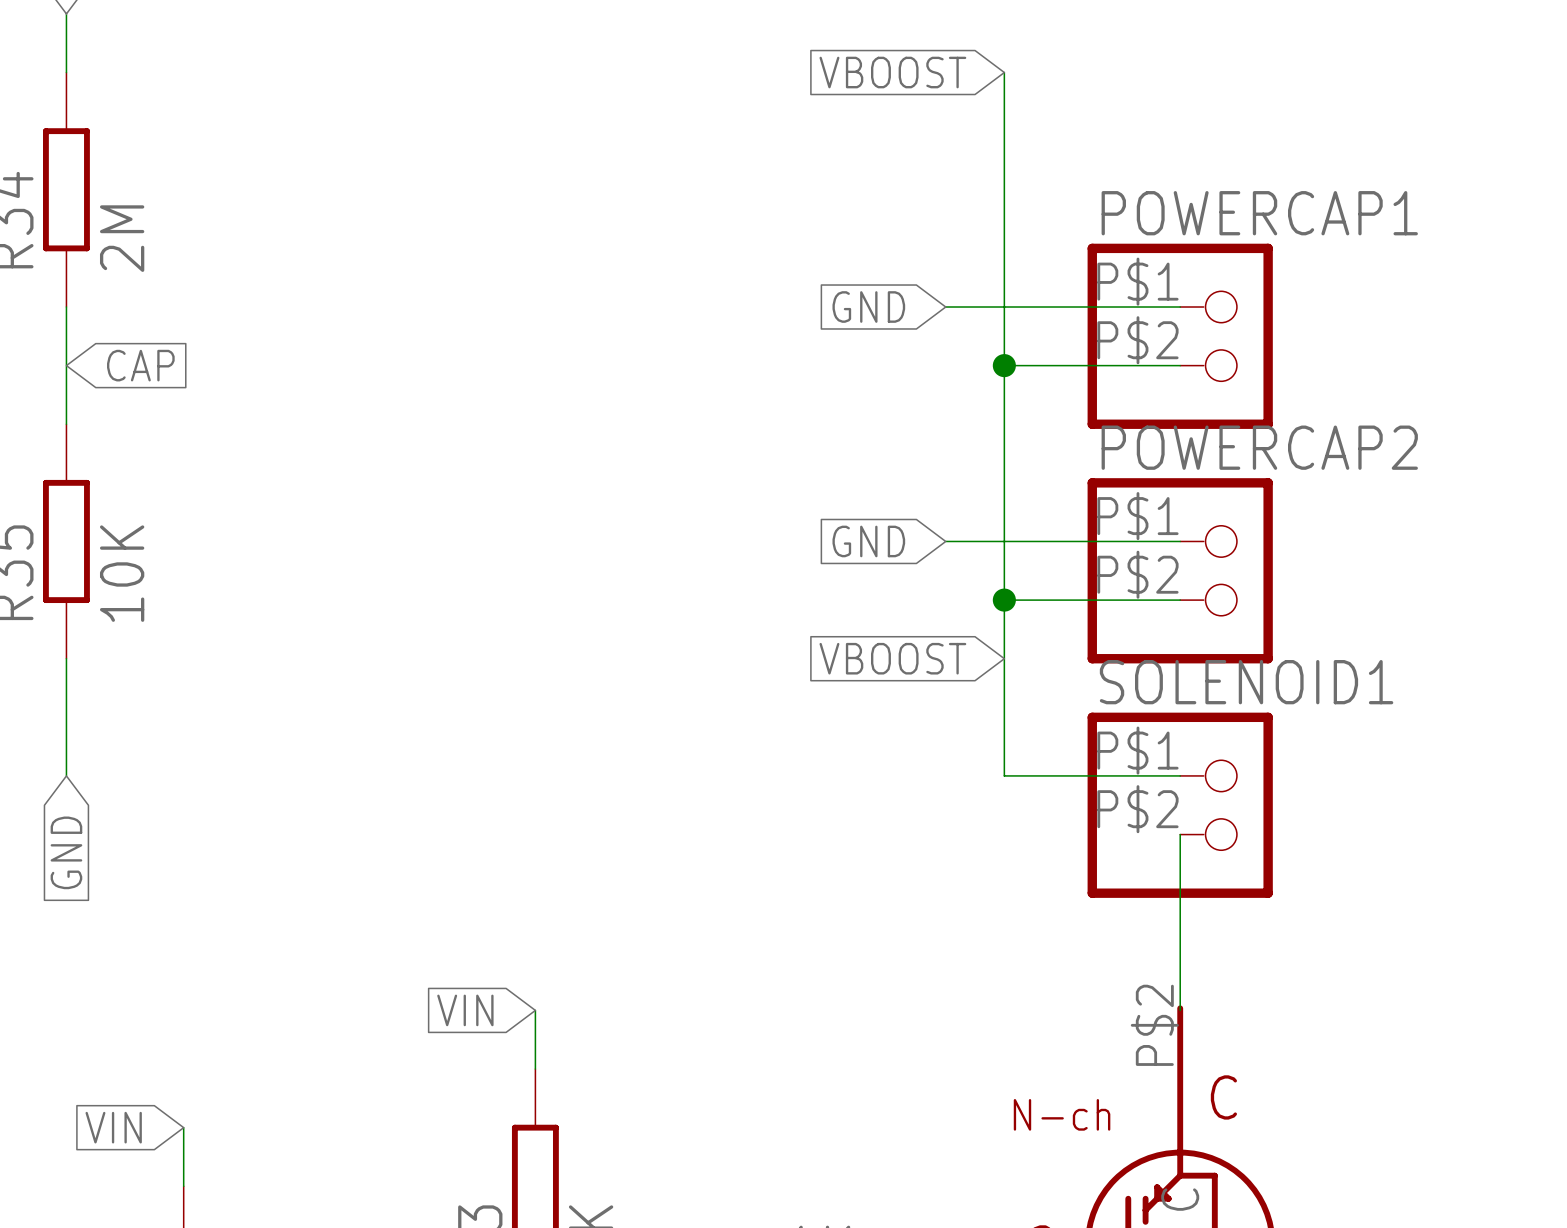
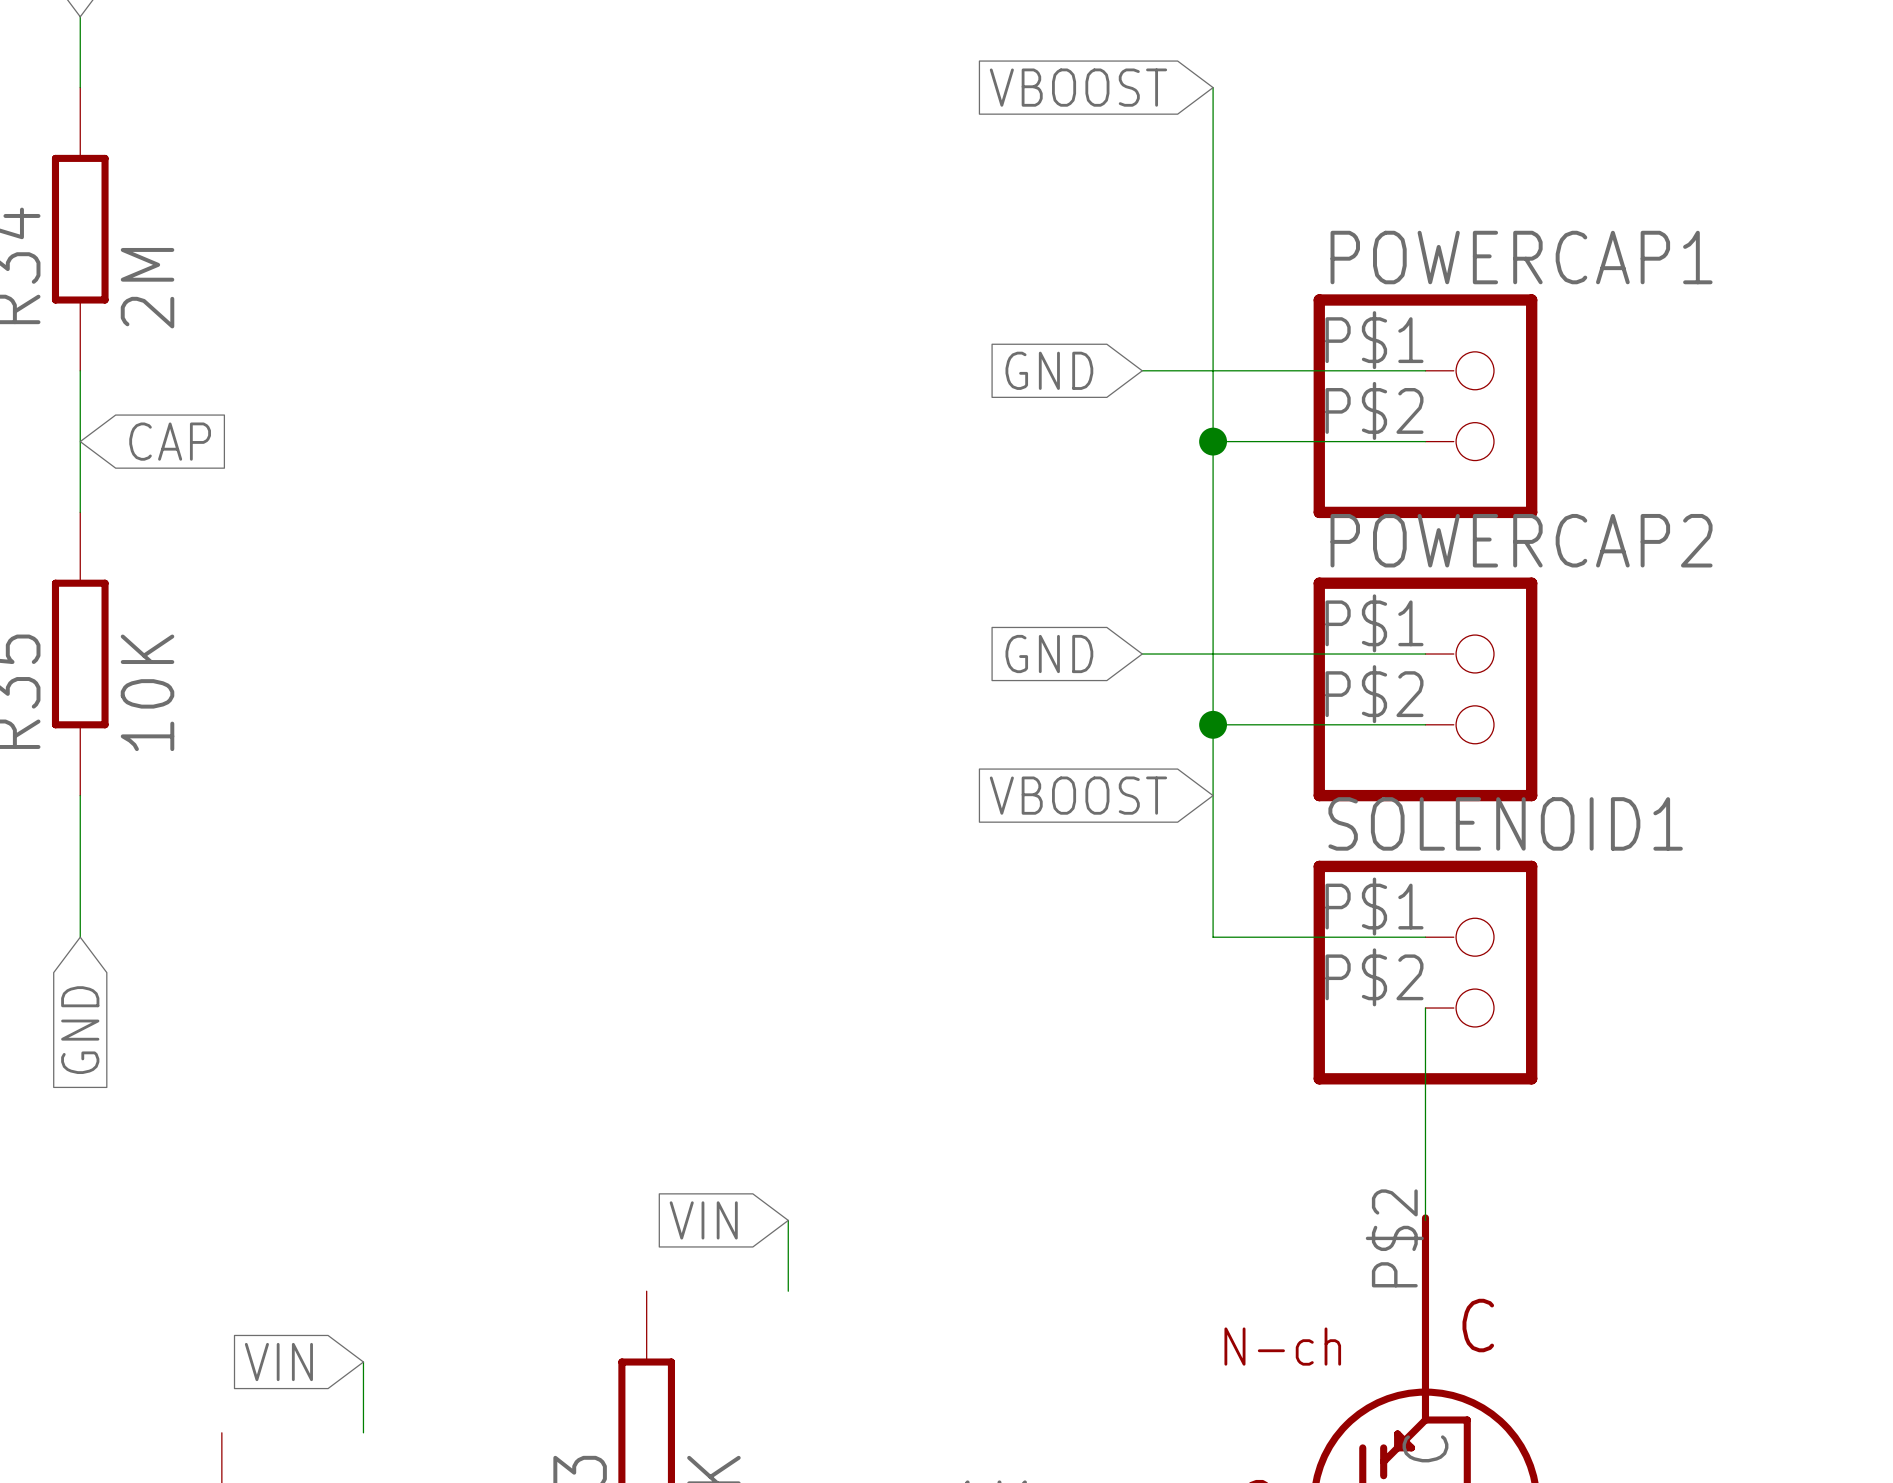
global label position: VIN (465, 1010) -> VIN (703, 1220)
wire: (535, 1010) (535, 1069) -> (788, 1220) (788, 1291)
global label position: VIN (113, 1127) -> VIN (278, 1362)
wire: (183, 1127) (183, 1186) -> (363, 1362) (363, 1432)

